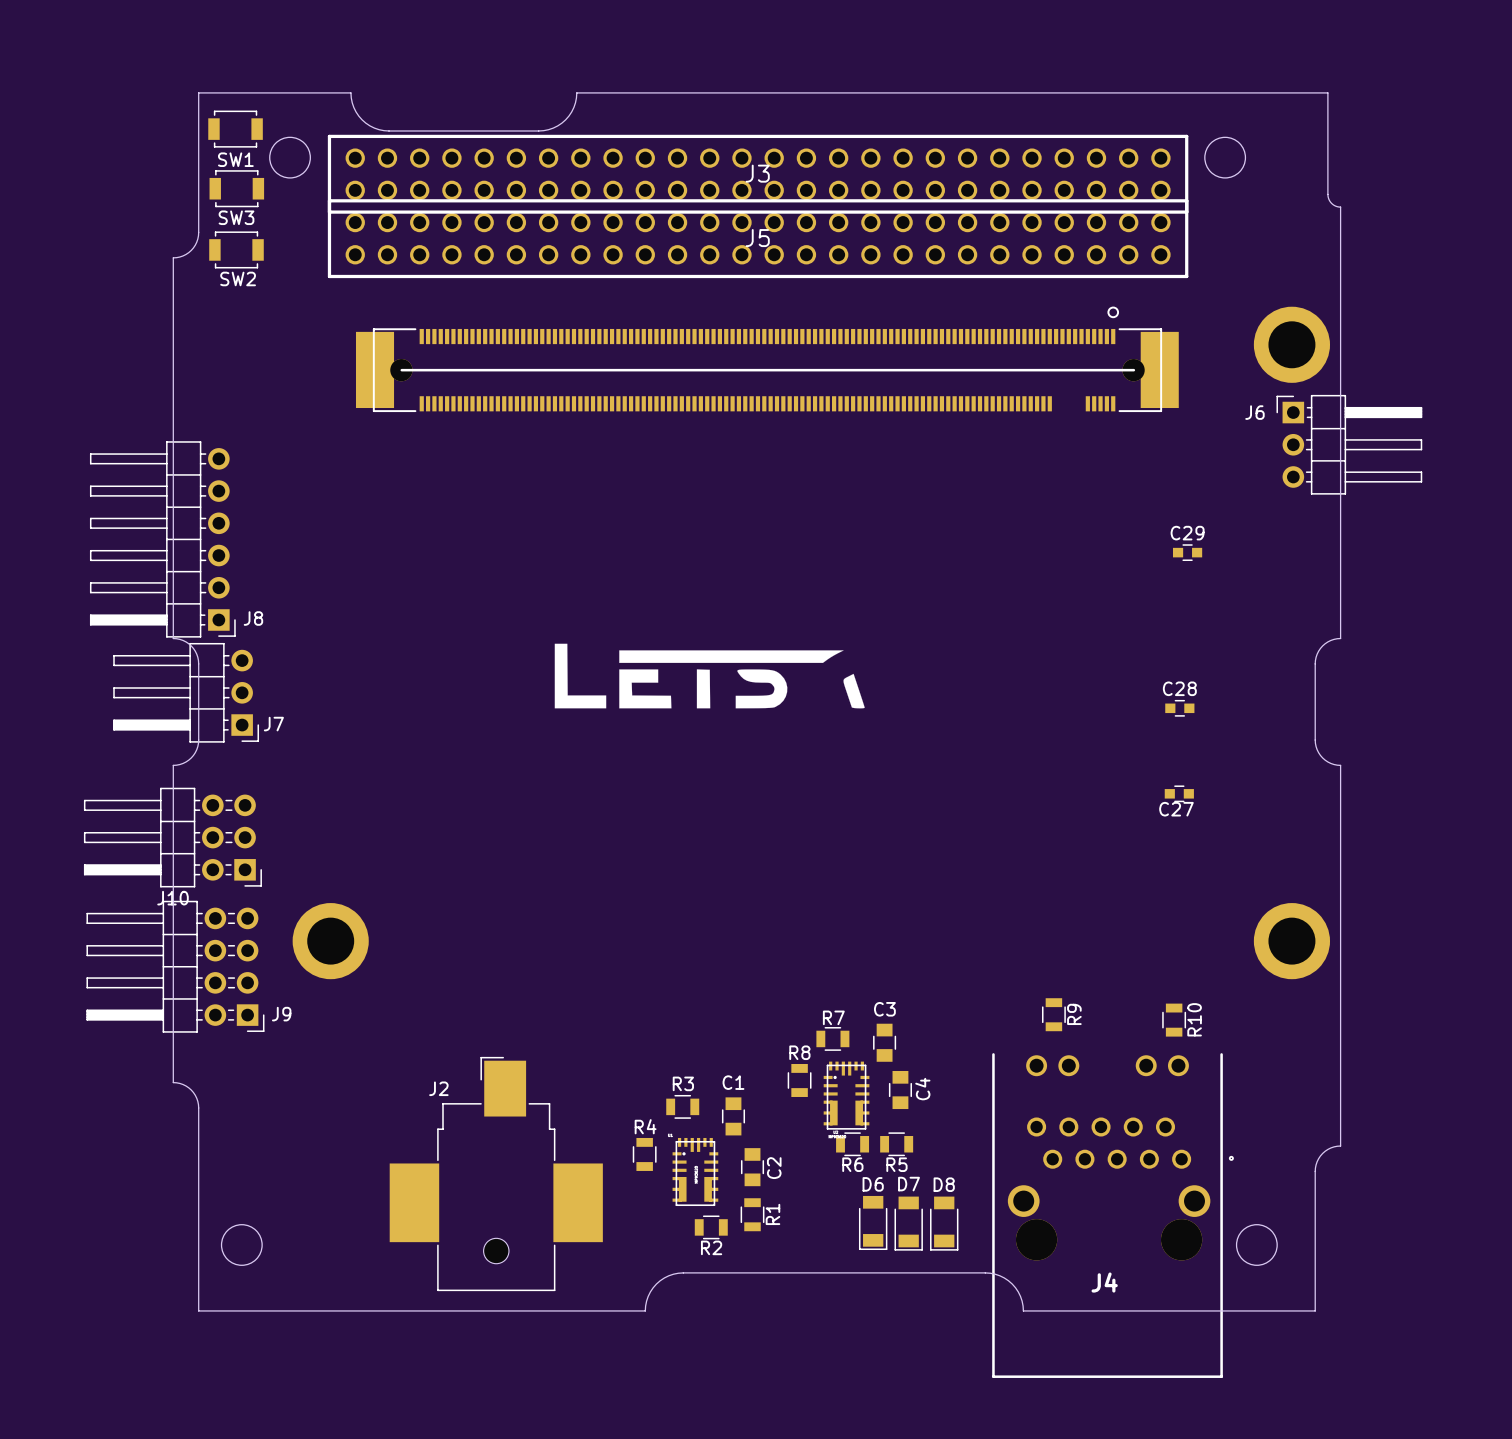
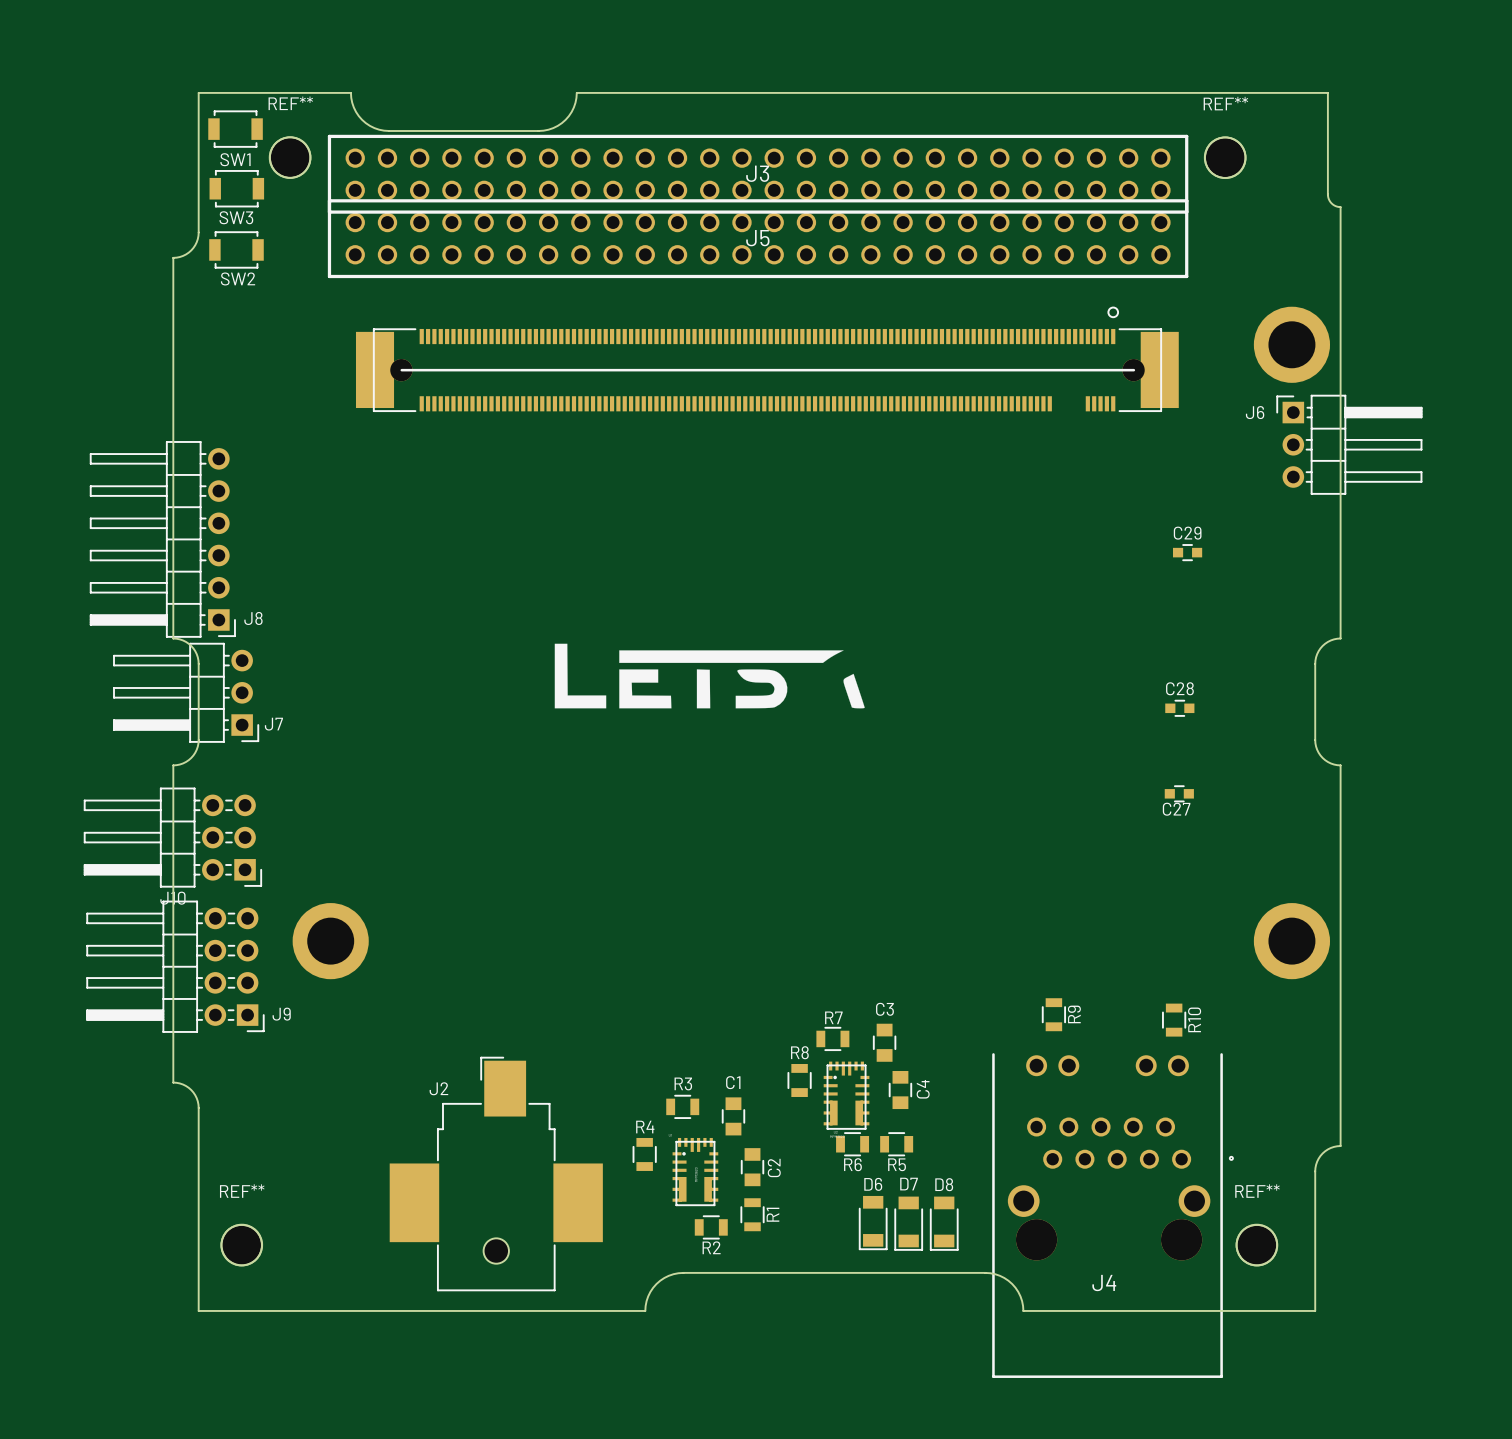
REF**: none -> (290, 157)
REF**: none -> (1225, 157)
REF**: none -> (241, 1245)
REF**: none -> (1256, 1245)

